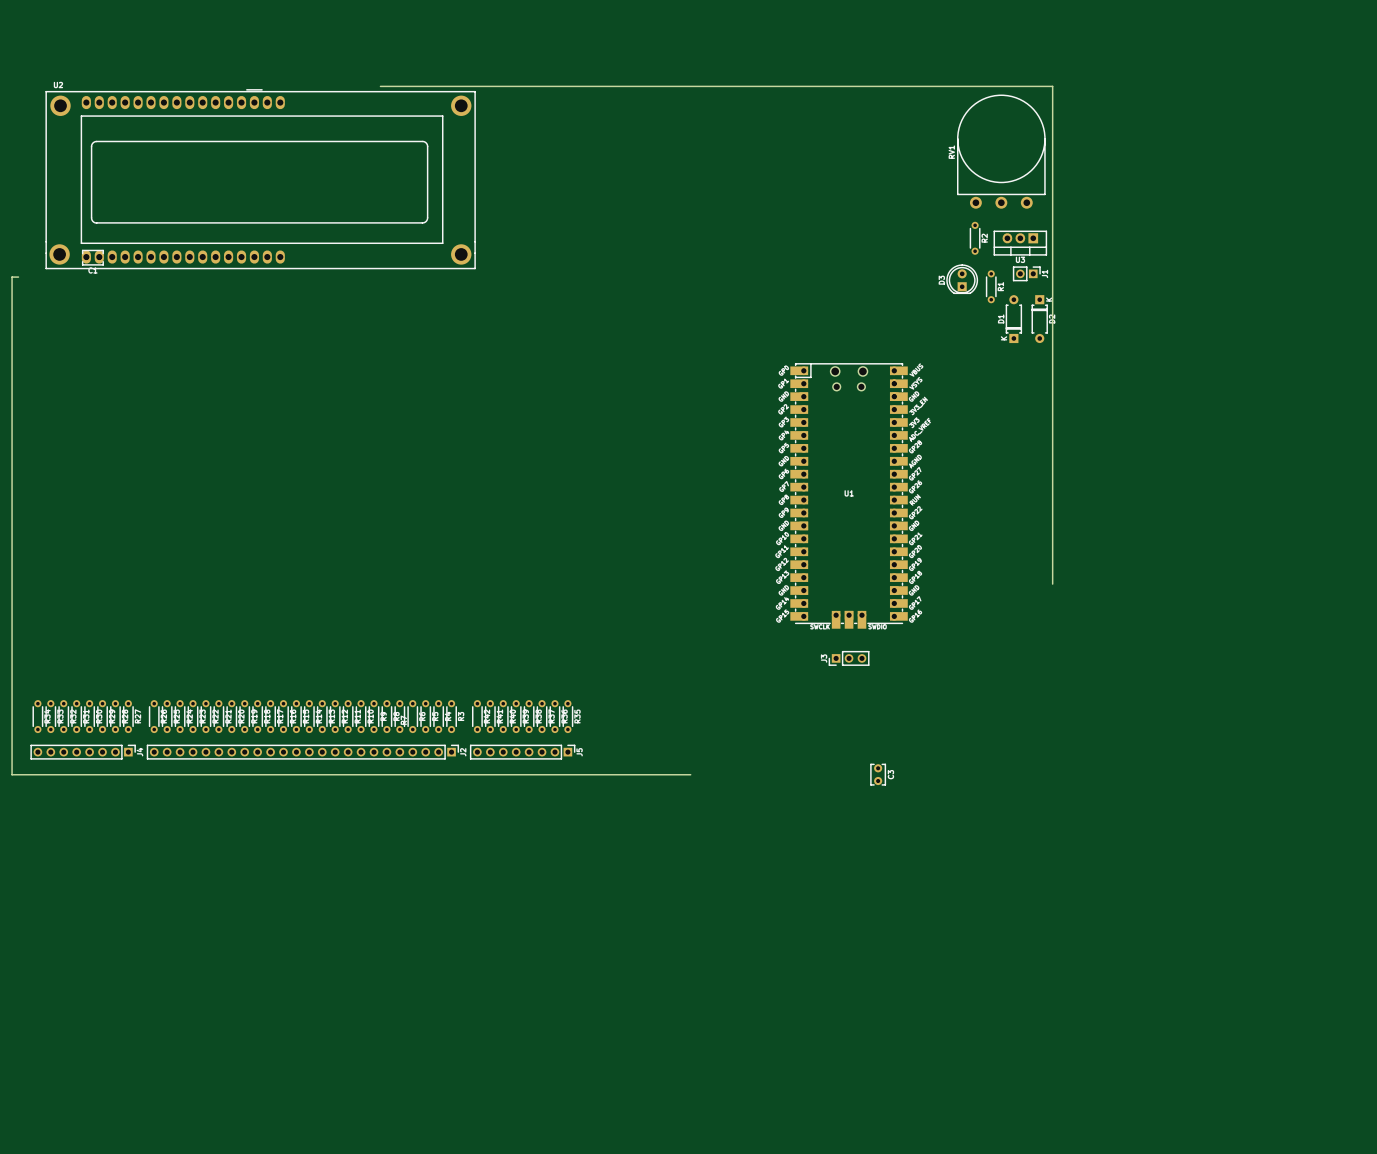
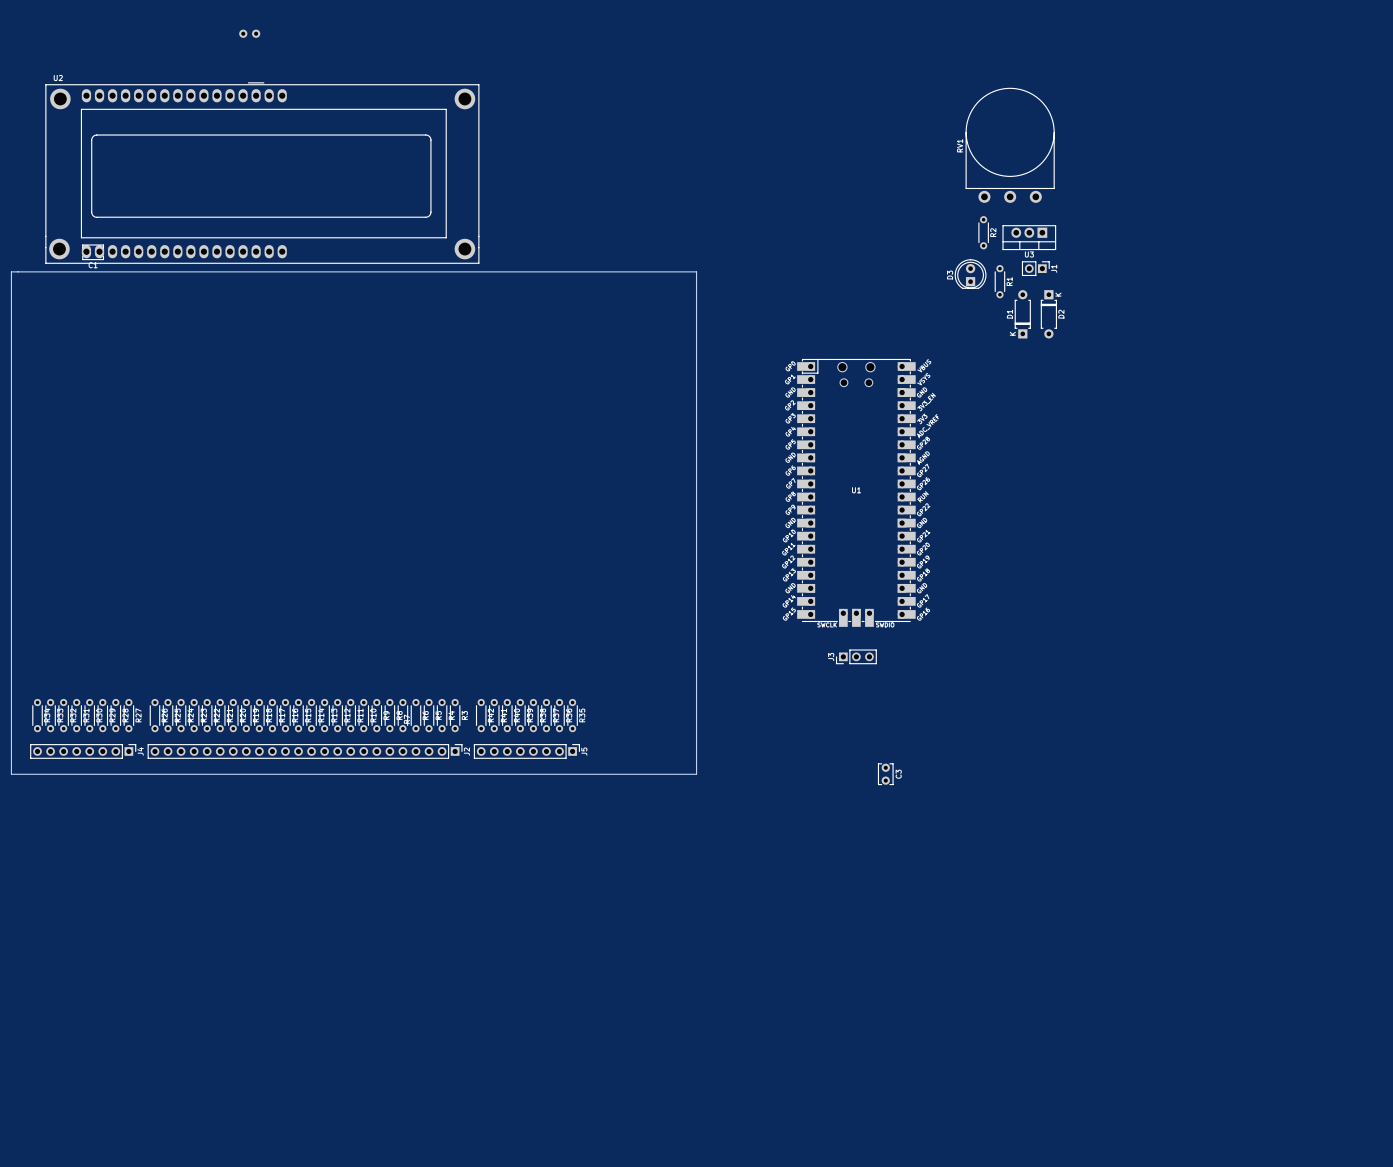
part: none -> (249, 33)
board edge: (380, 86) (1052, 86) (1052, 584) -> none
board edge: none -> (17, 271) (696, 271) (696, 774)

